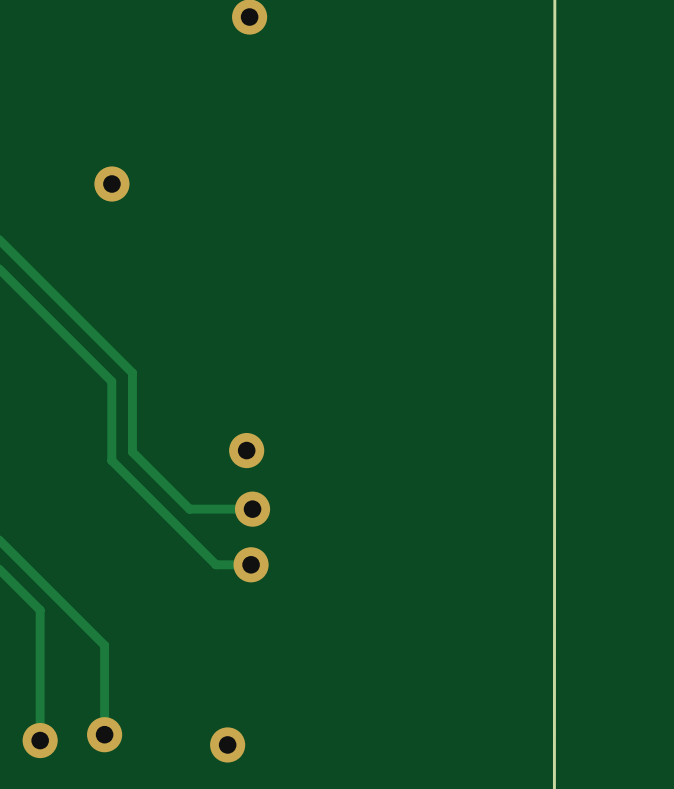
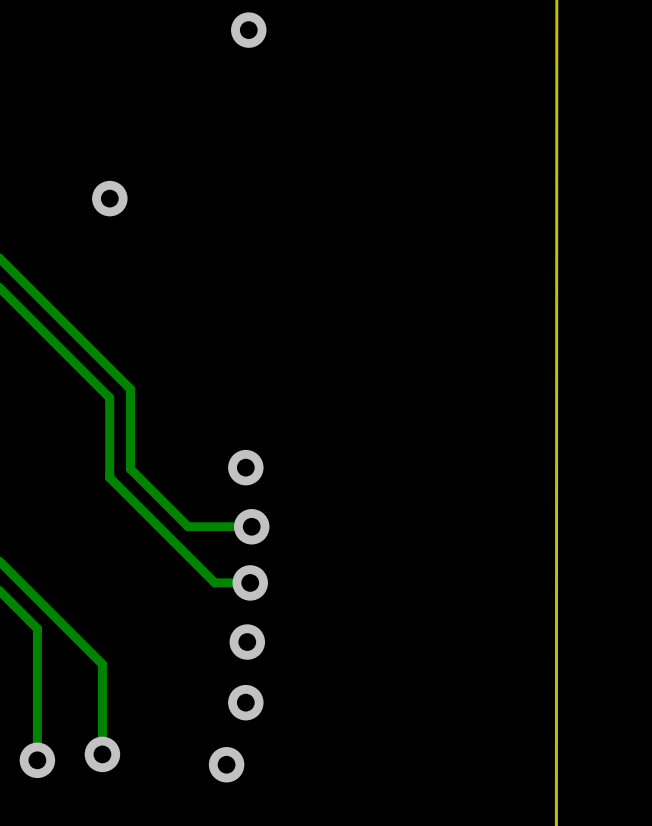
via: none -> (247, 642)
via: none -> (245, 702)

